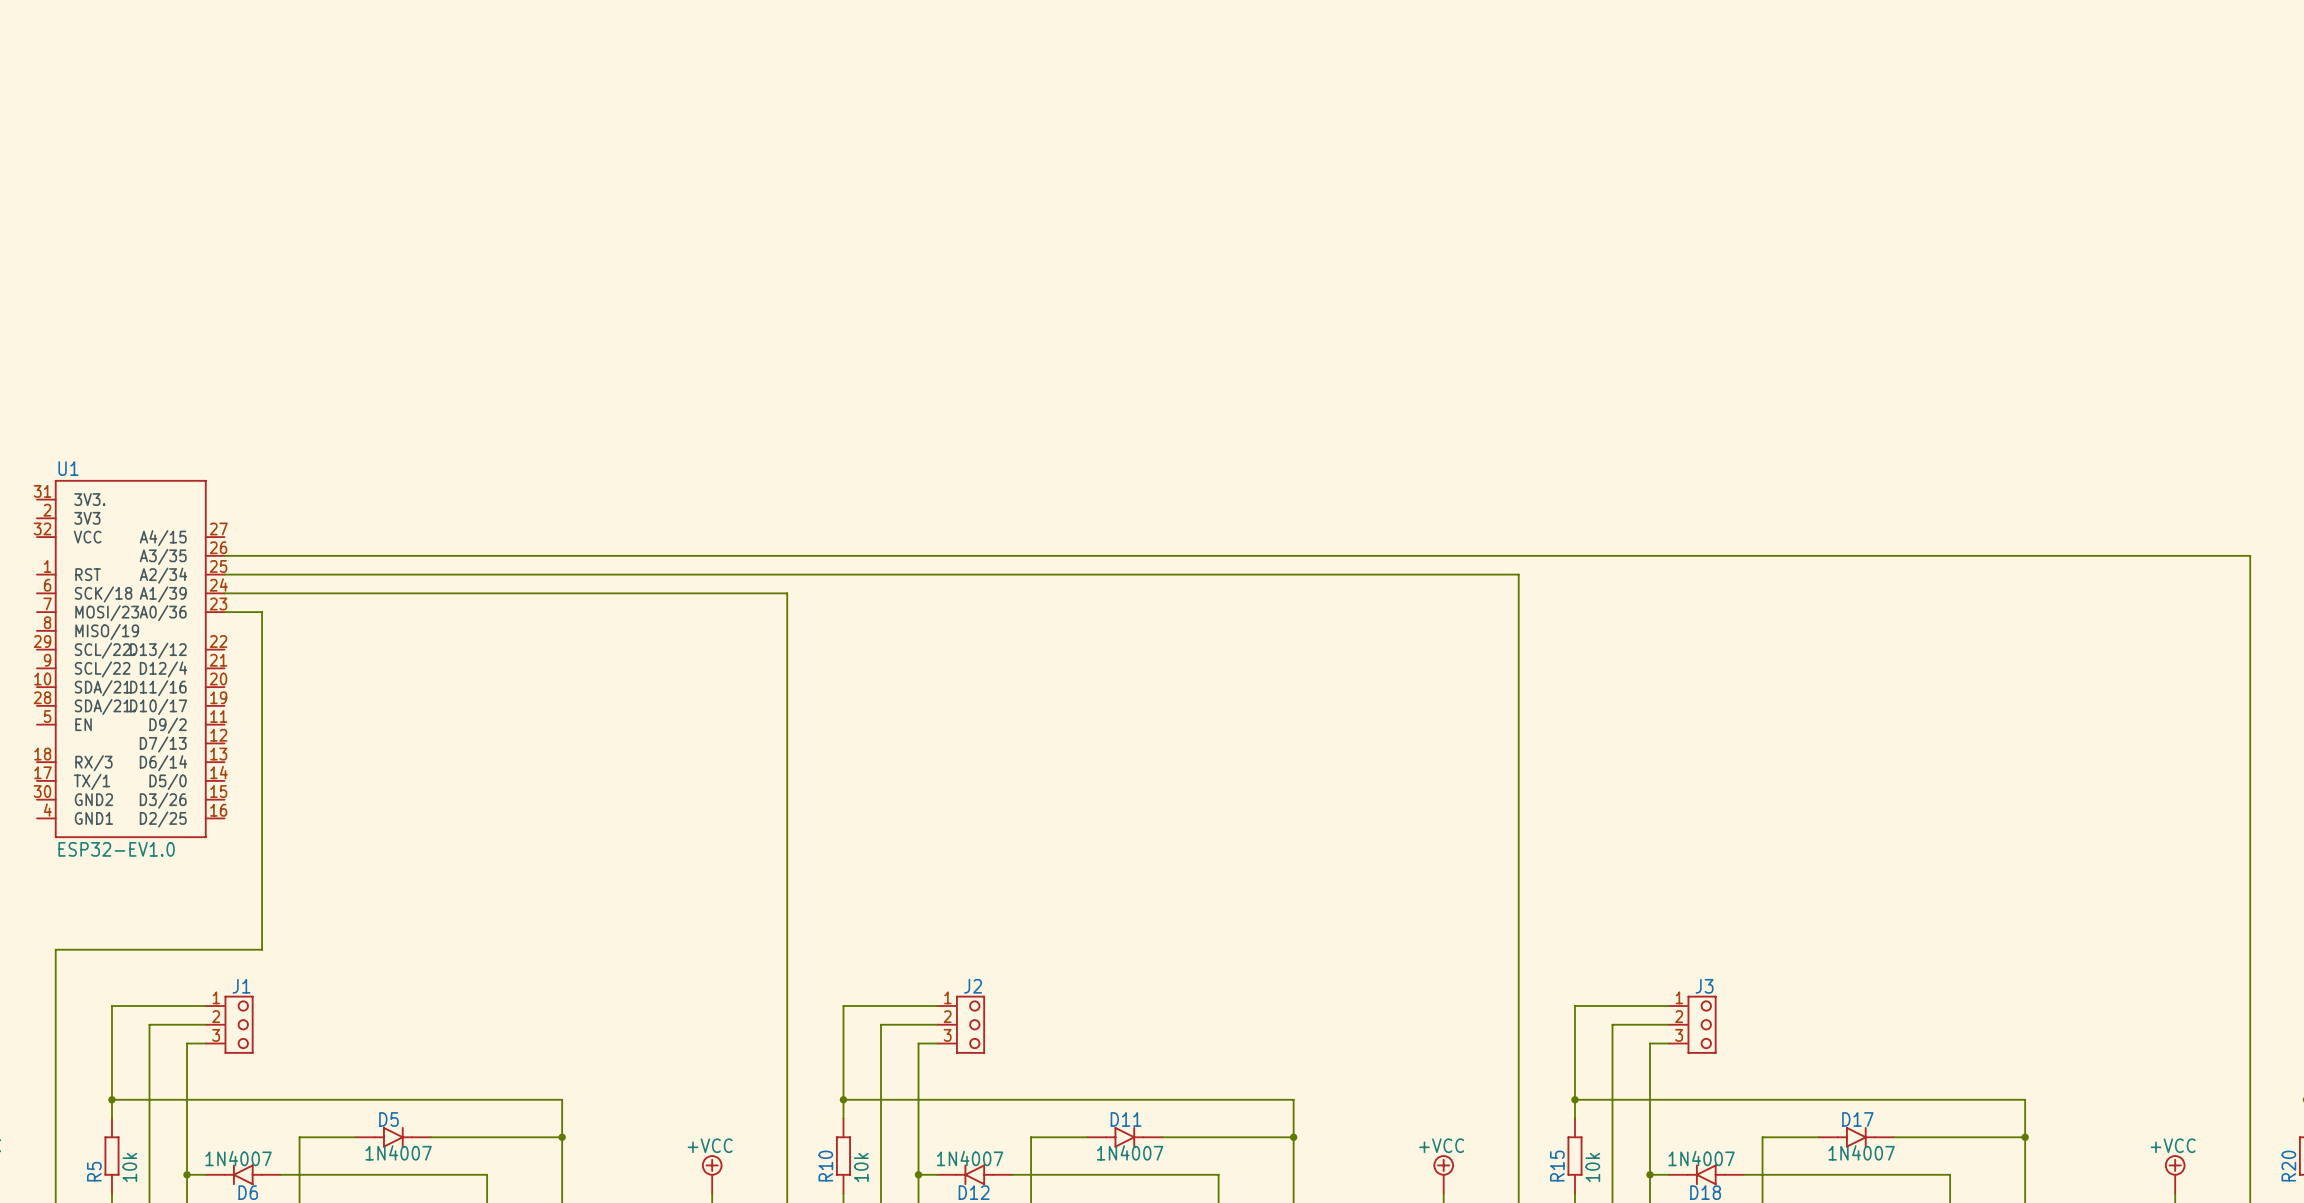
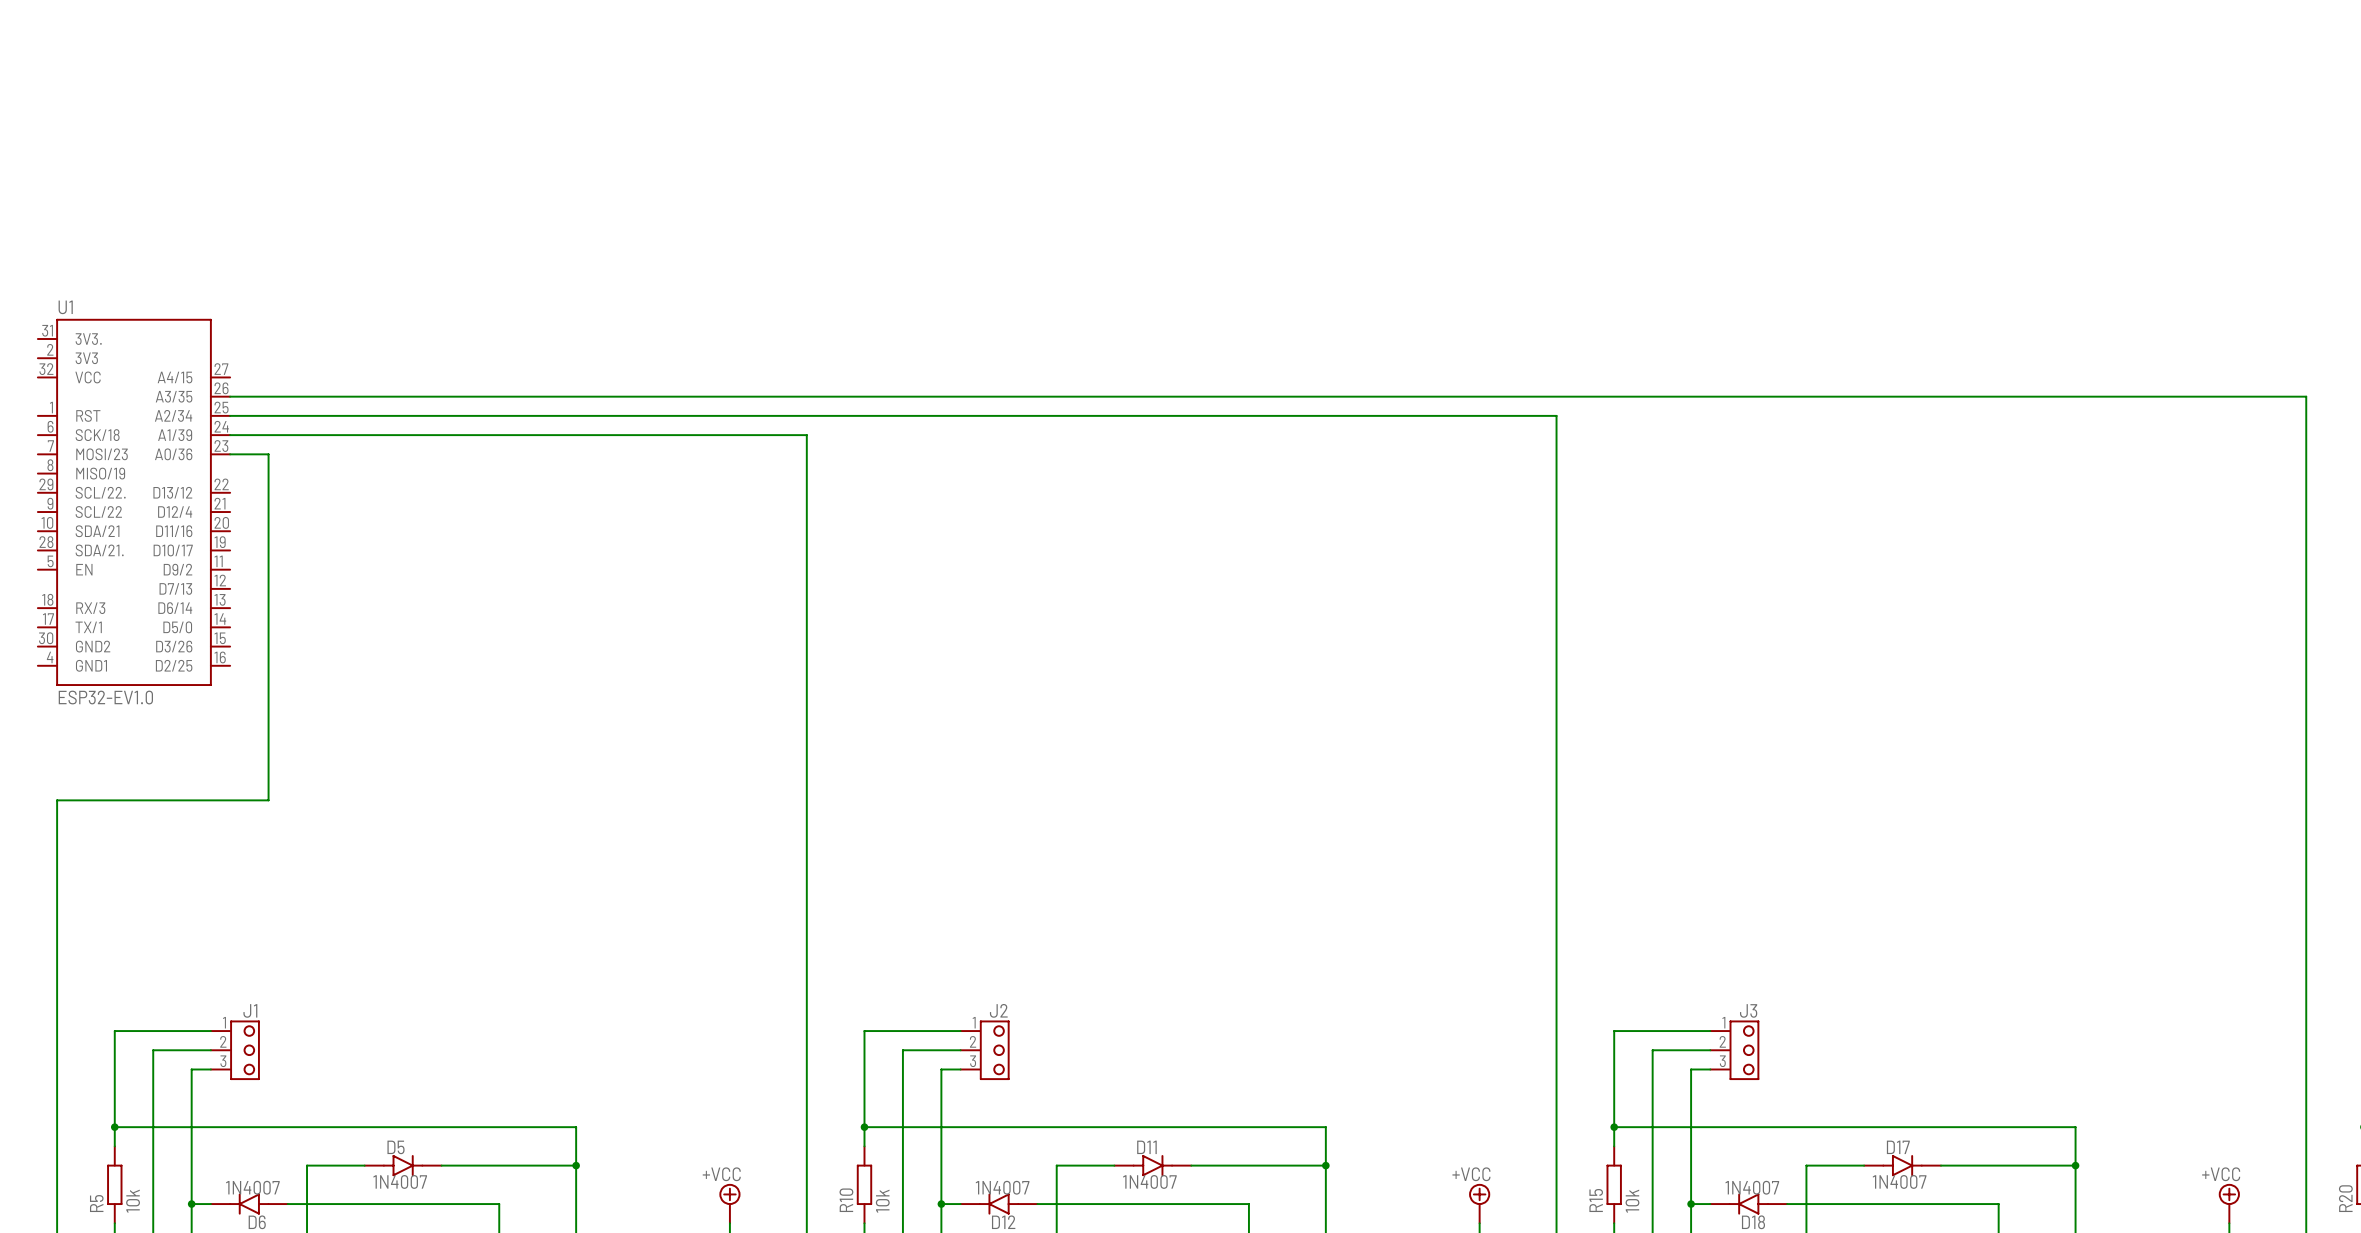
wire: (224, 555) (2250, 555) -> (230, 396) (2306, 396) (2306, 569)
wire: (224, 574) (1518, 574) -> (230, 415) (1556, 415) (1556, 588)
wire: (224, 593) (787, 593) -> (230, 435) (806, 435) (806, 608)
wire: (224, 612) (262, 612) -> (230, 454) (268, 454) (268, 627)
U1 position: (130, 659) -> (134, 502)
wire: (262, 780) (262, 949) (55, 949) -> (268, 800) (57, 800) (57, 973)

